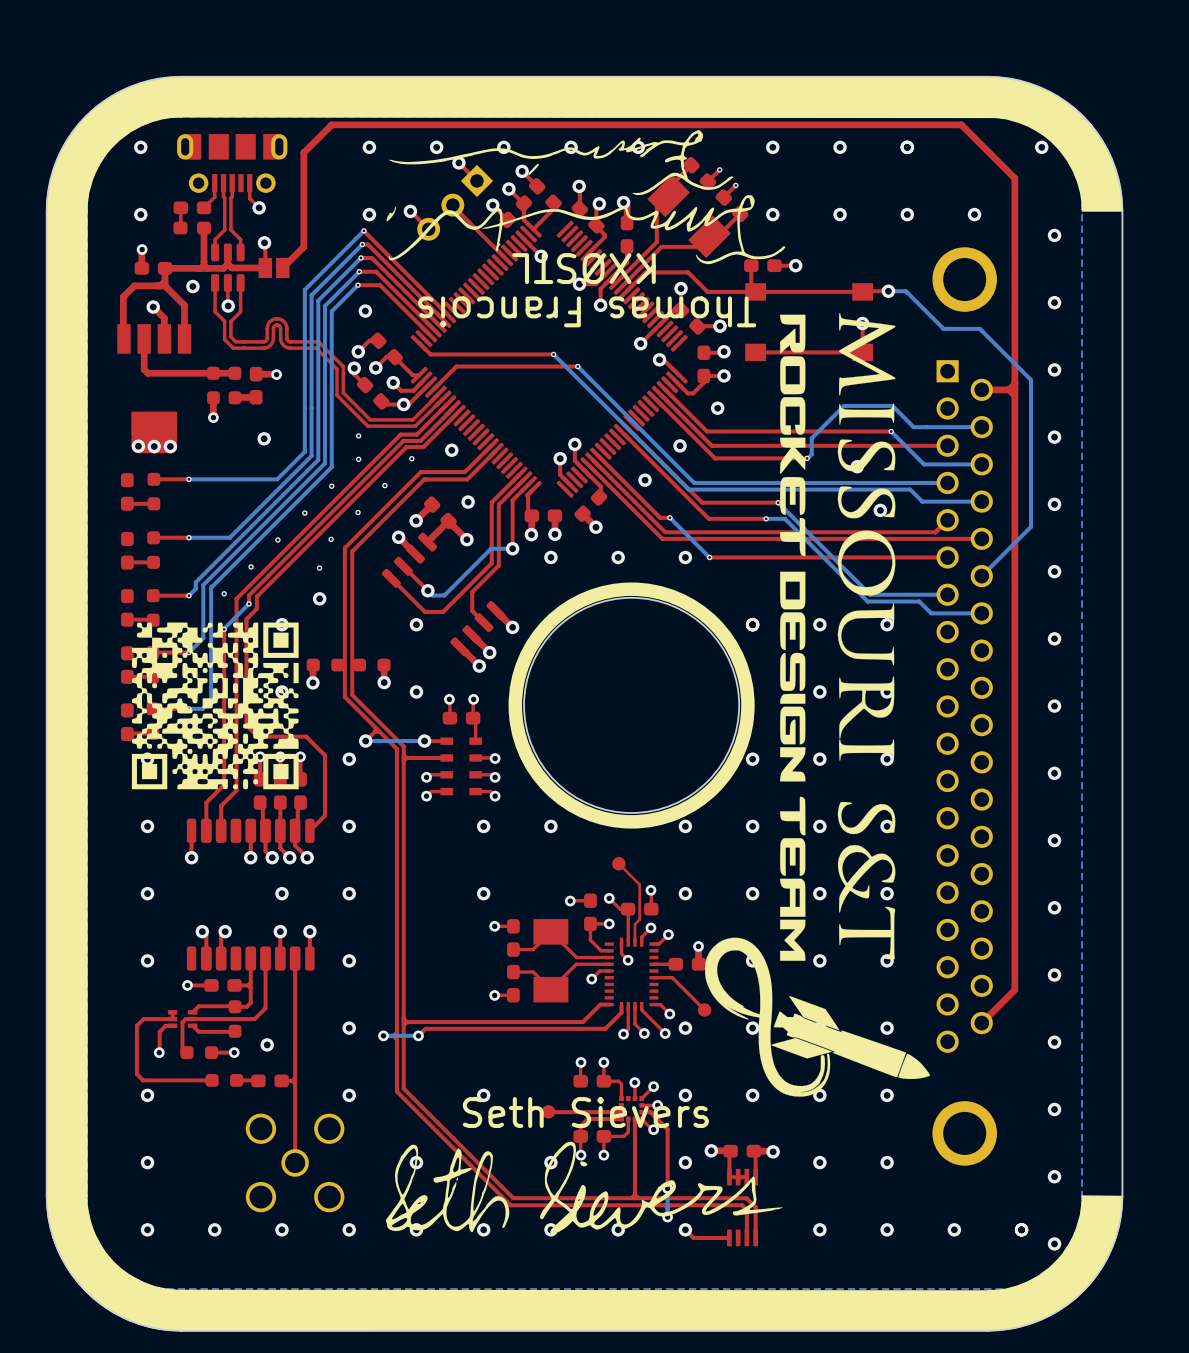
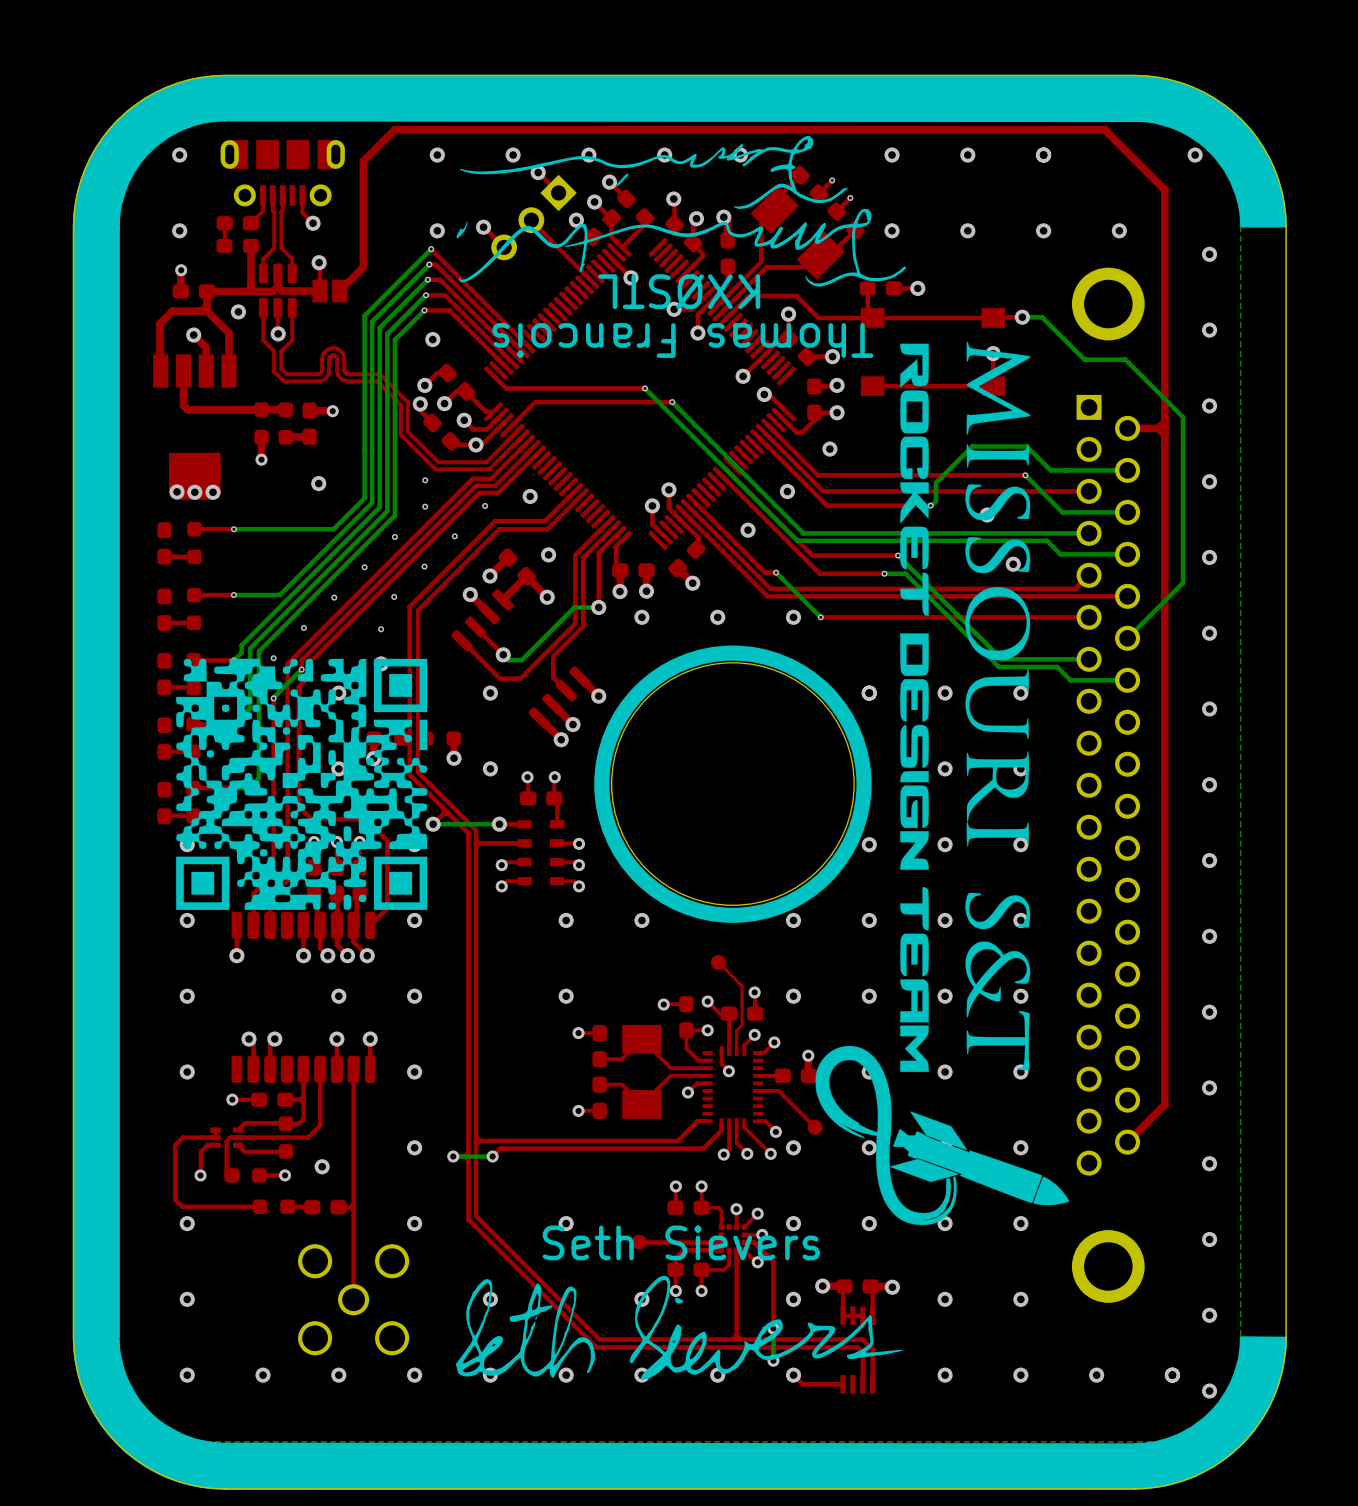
drawing: none -> [176, 658, 428, 910]
drawing: [131, 622, 299, 790] -> none

